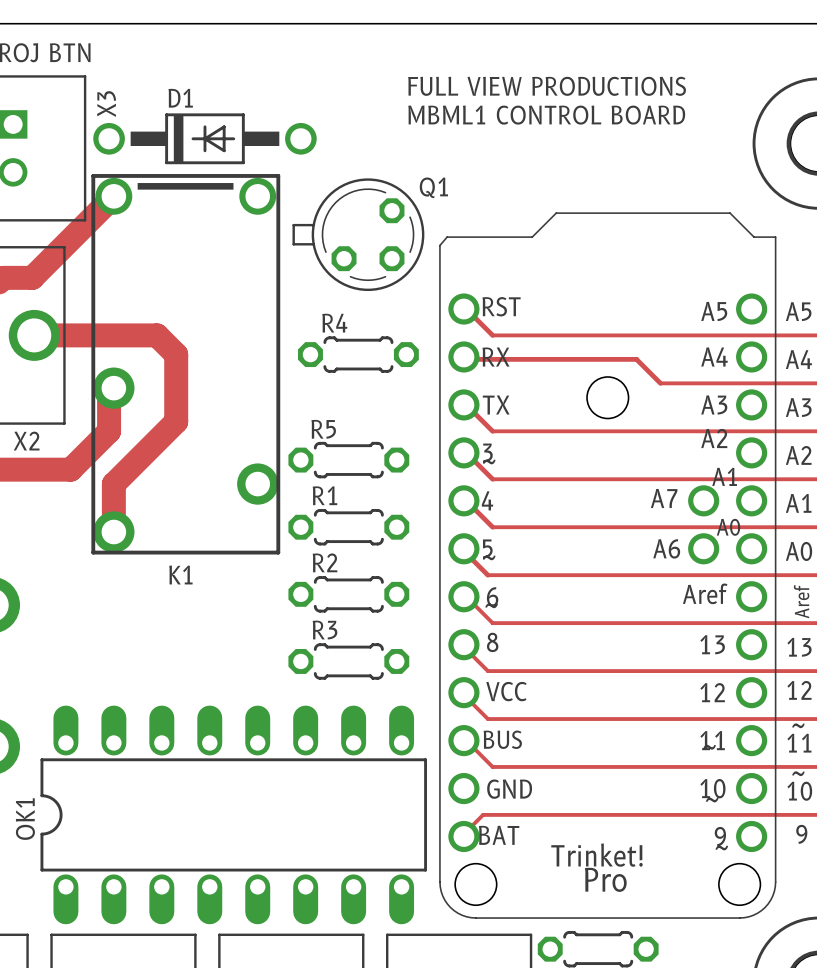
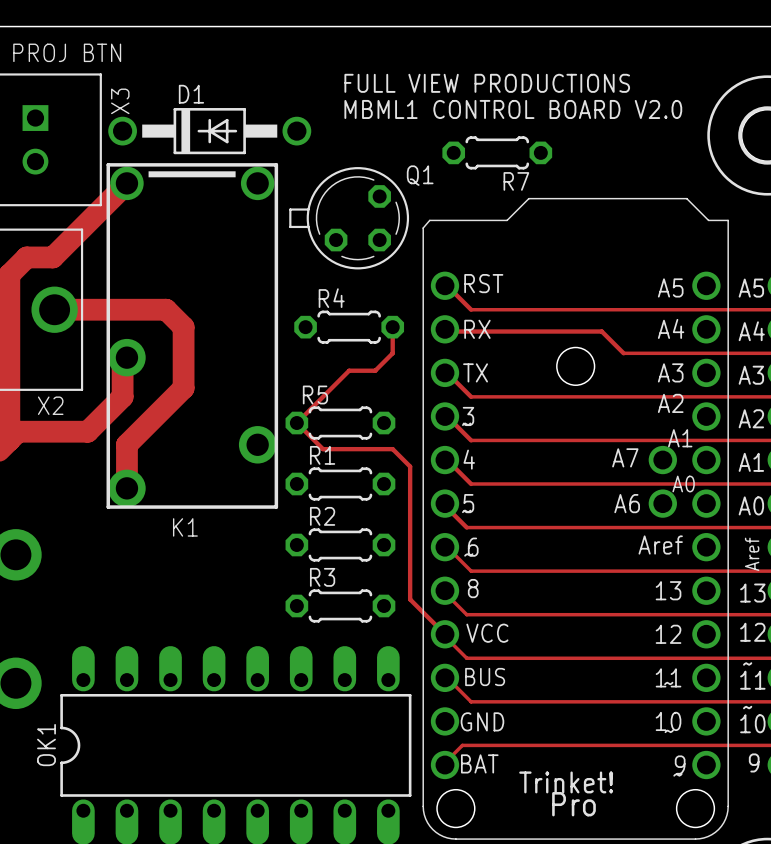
text position: FULL VIEW PRODUCTIONS (547, 86) -> FULL VIEW PRODUCTIONS (487, 83)
text: MBML1 CONTROL BOARD (546, 115) -> MBML1 CONTROL BOARD V2.0 (513, 109)
R7: none -> (497, 152)
track: none -> (392, 327) (392, 353) (375, 370) (349, 370) (296, 423) (323, 449) (392, 449) (410, 466) (410, 599) (444, 634)

